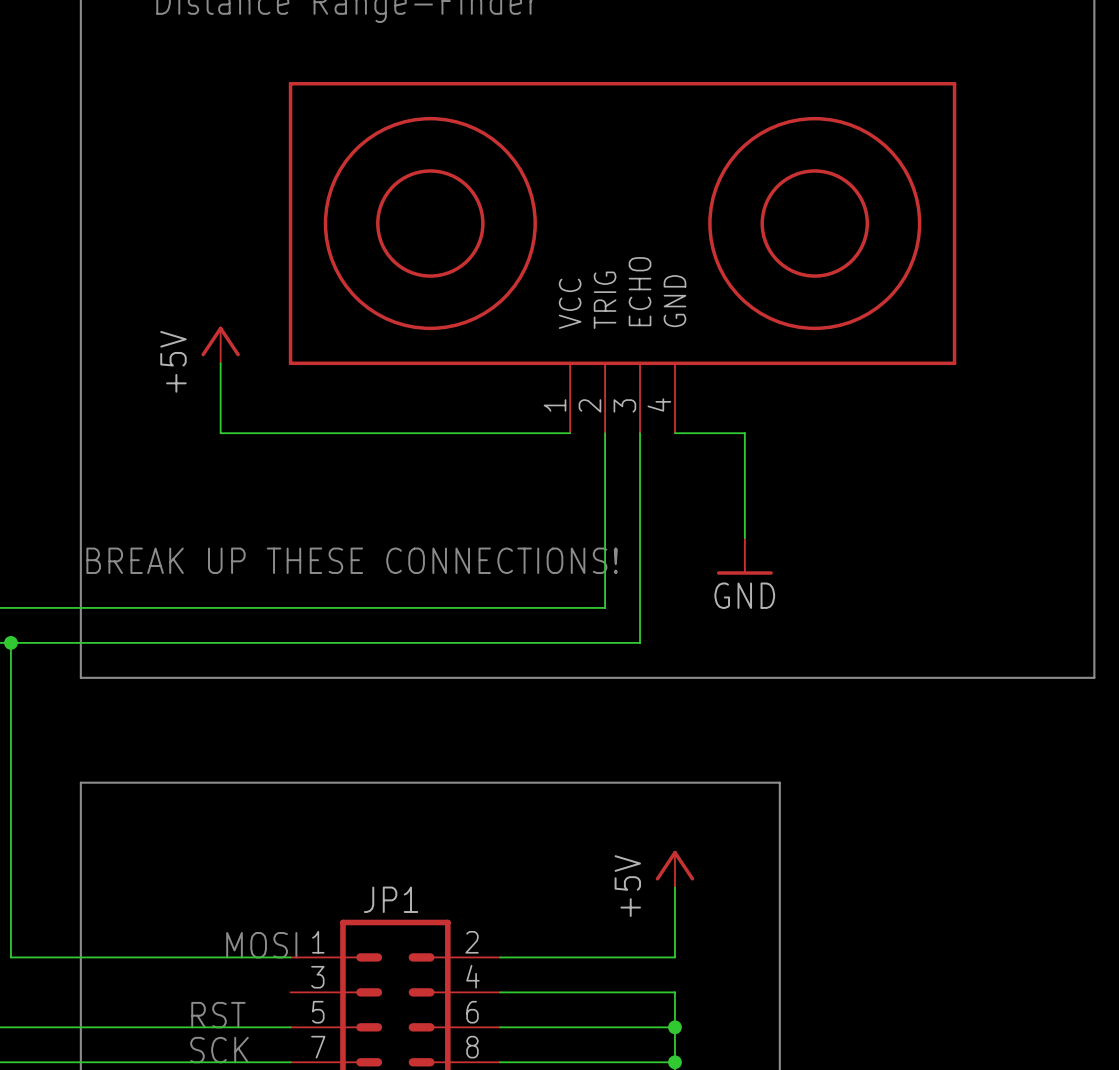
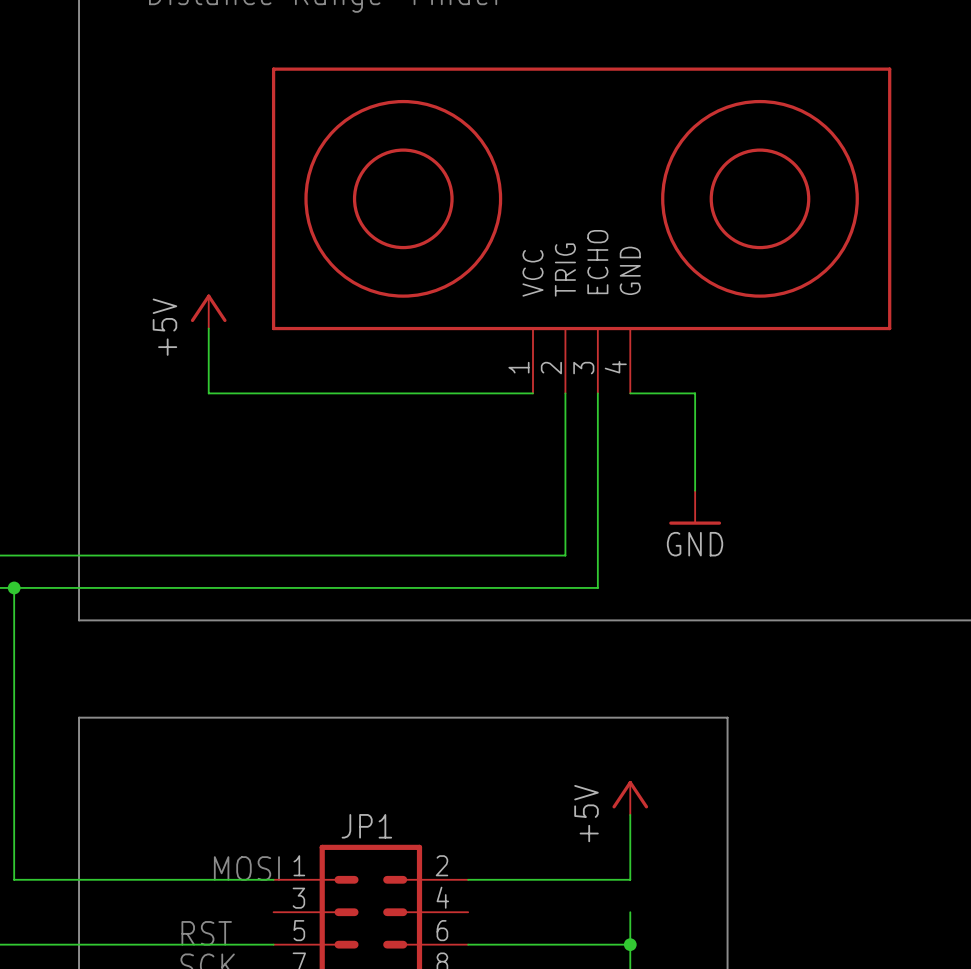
text: BREAK UP THESE CONNECTIONS! (352, 560) -> none
wire: (500, 992) (674, 992) -> none

